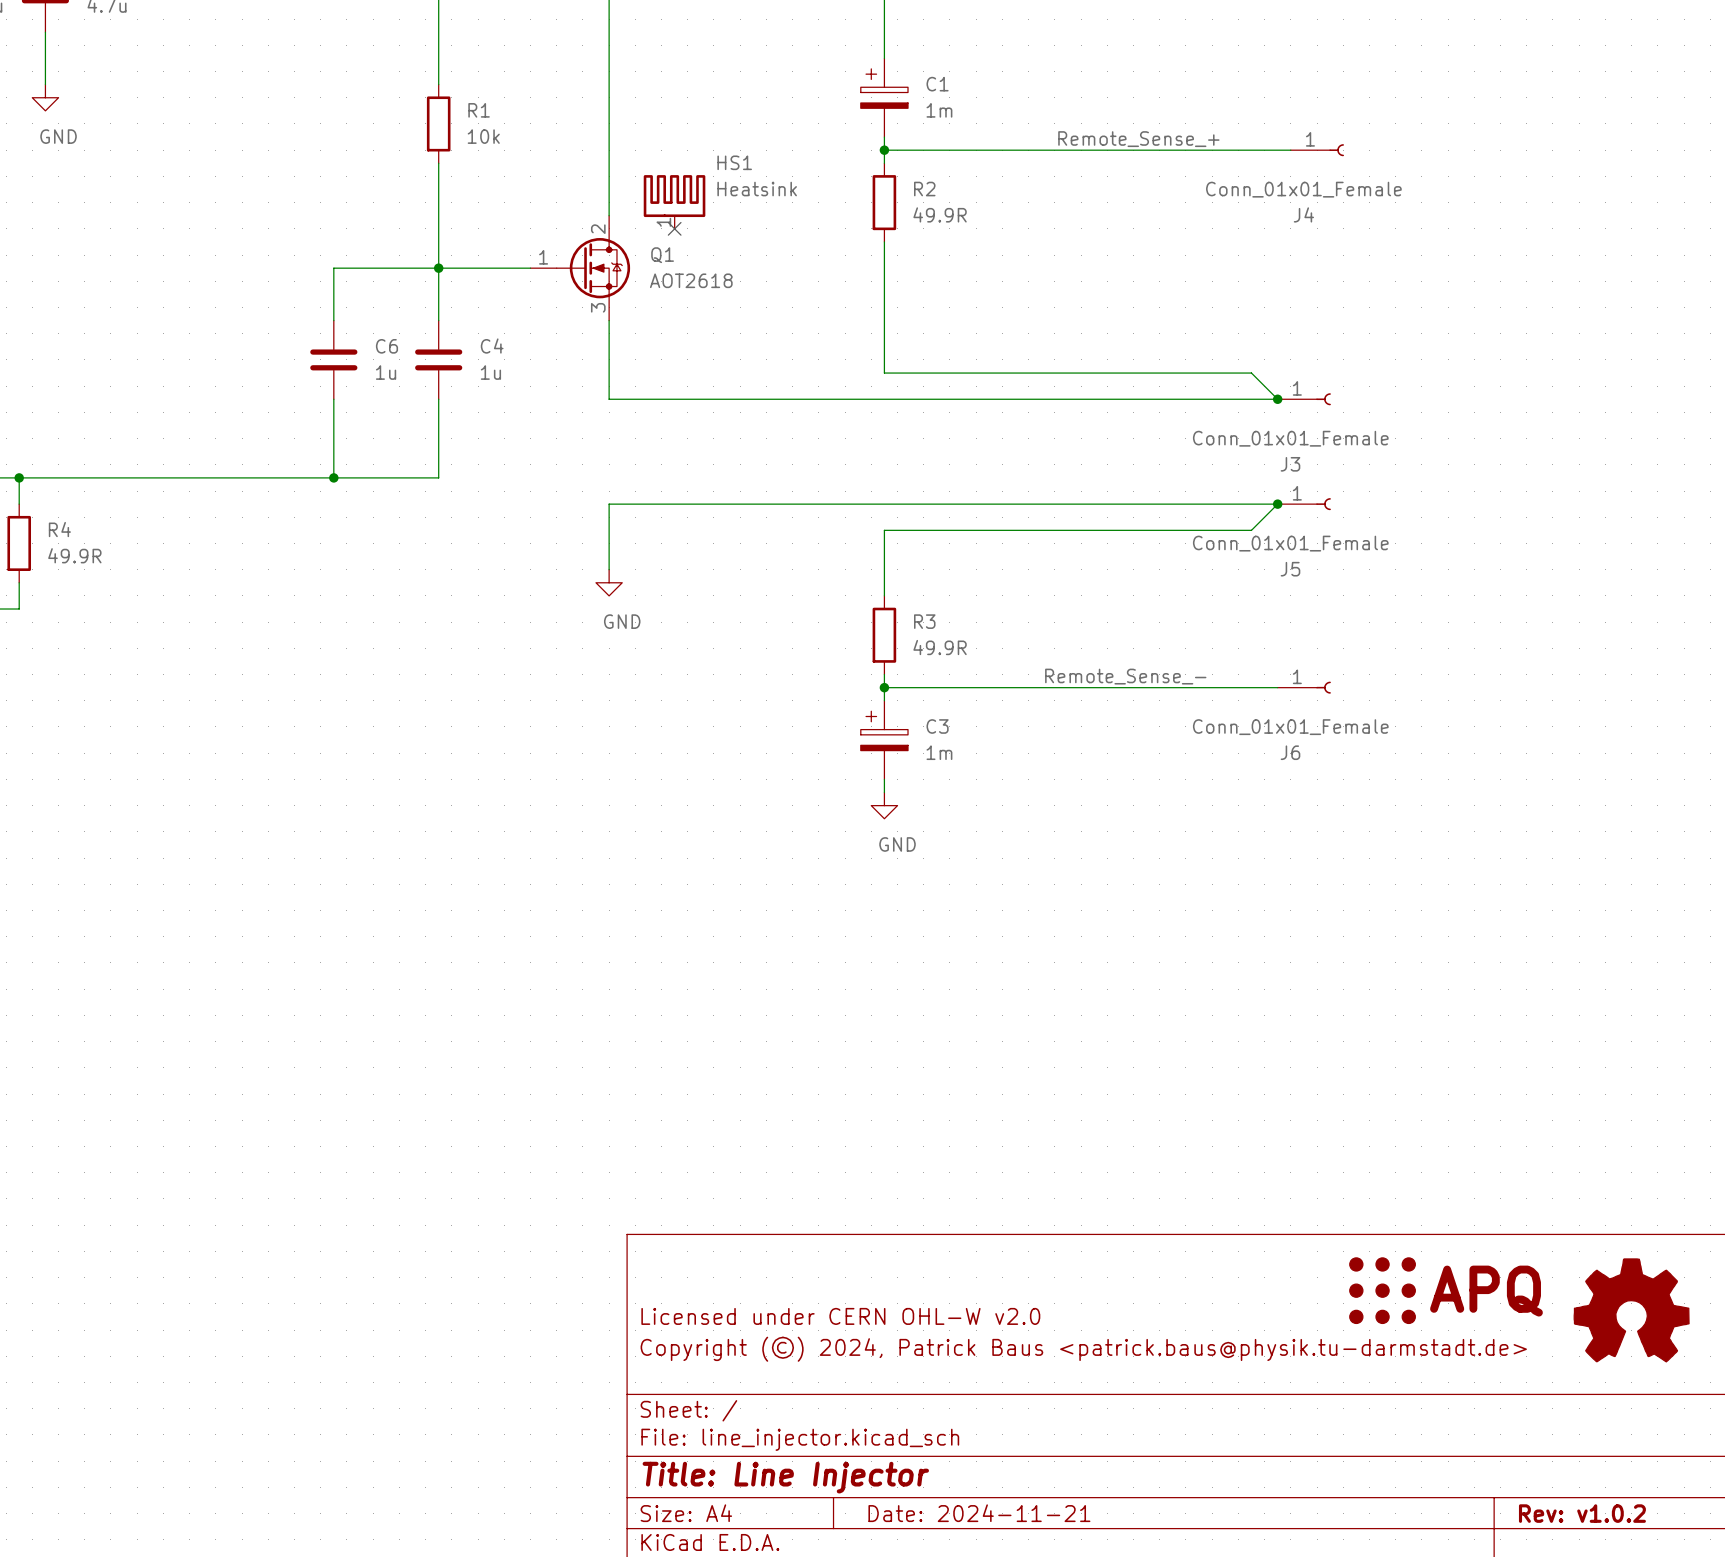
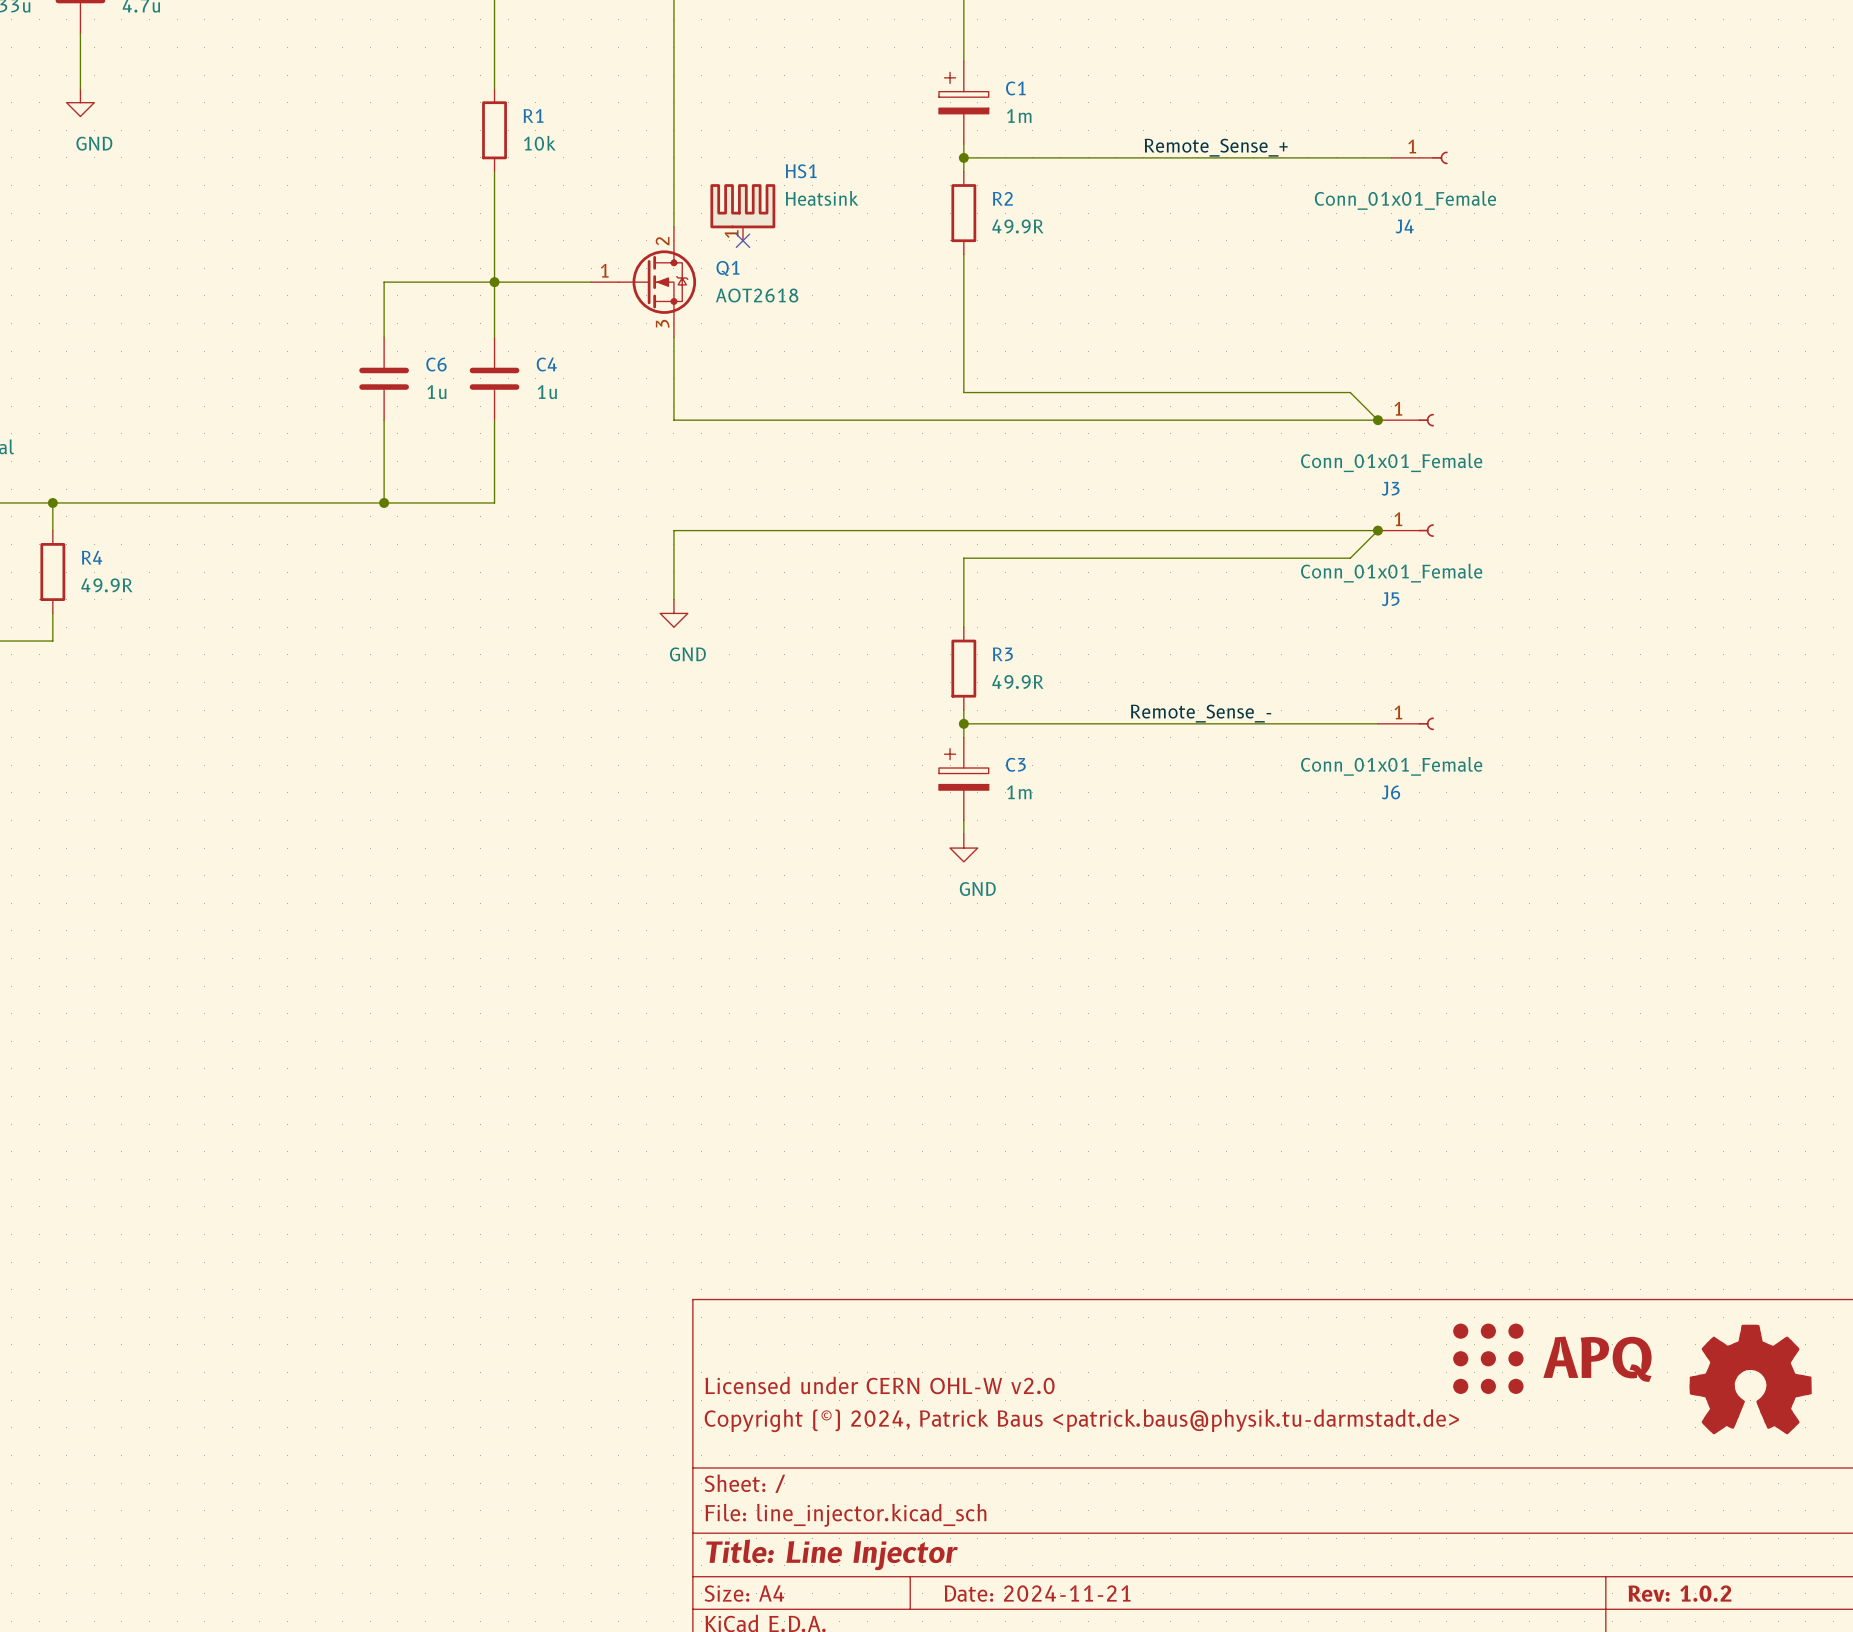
title block: Rev: v1.0.2 (1582, 1513) -> Rev: 1.0.2 (1679, 1593)

